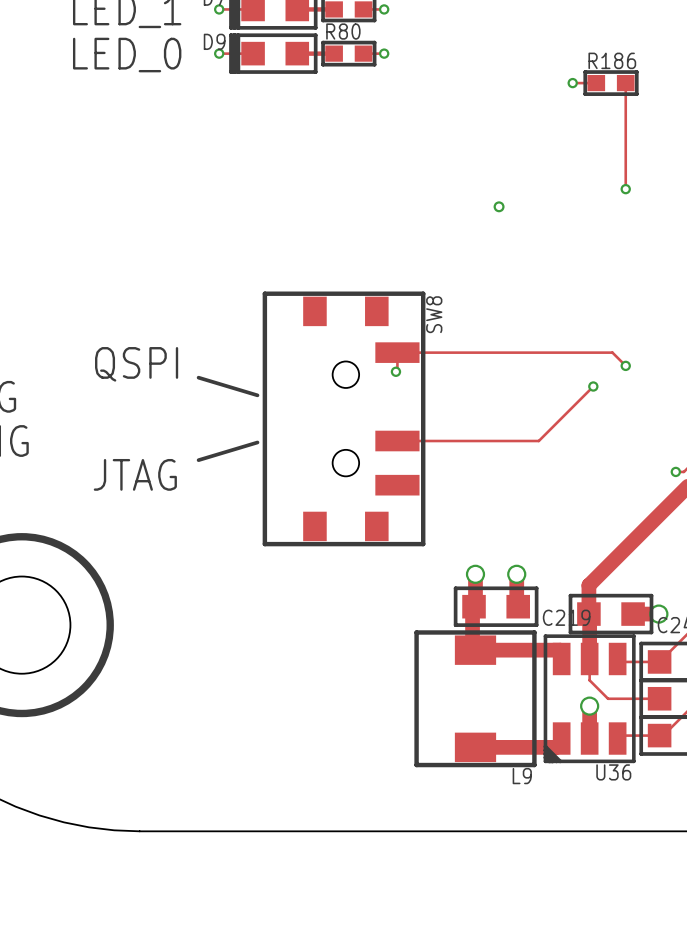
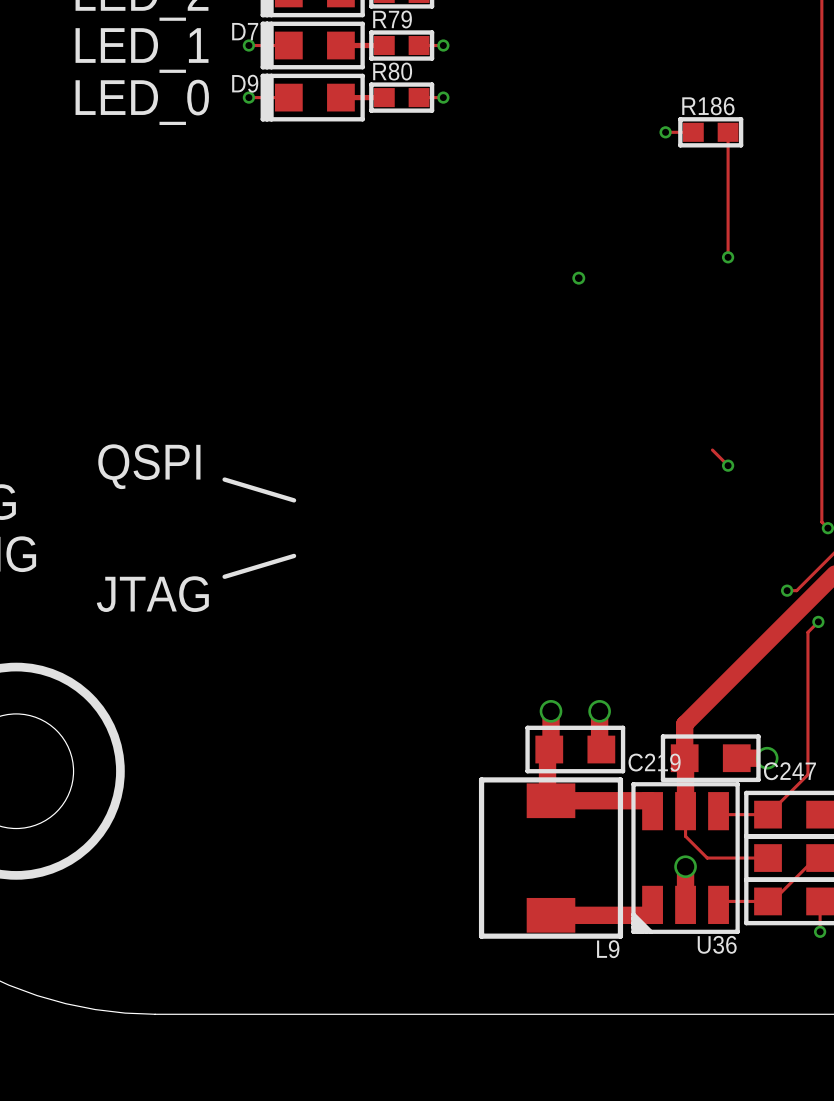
track: (612, 352) (397, 352) (395, 371) -> none
via: (395, 371) -> none
track: (593, 386) (538, 441) (397, 441) -> none
via: (593, 386) -> none
SW8: (344, 418) -> none

